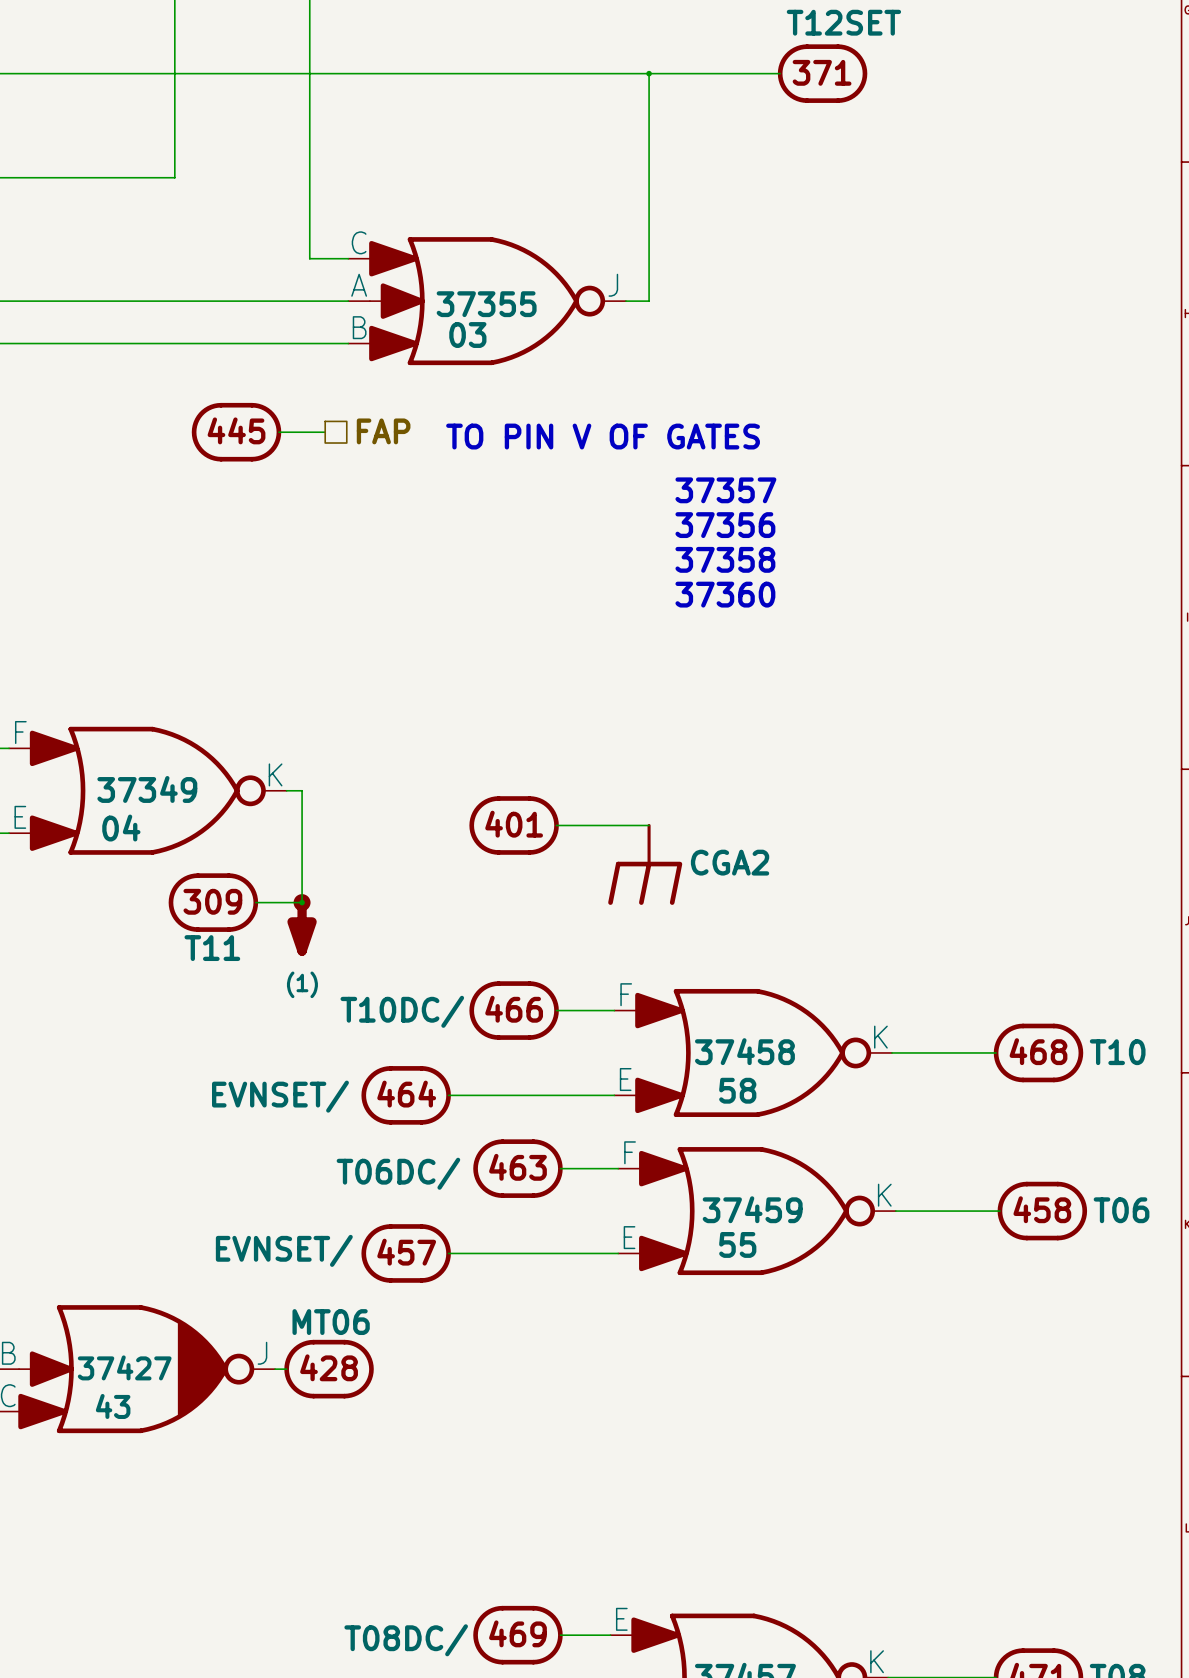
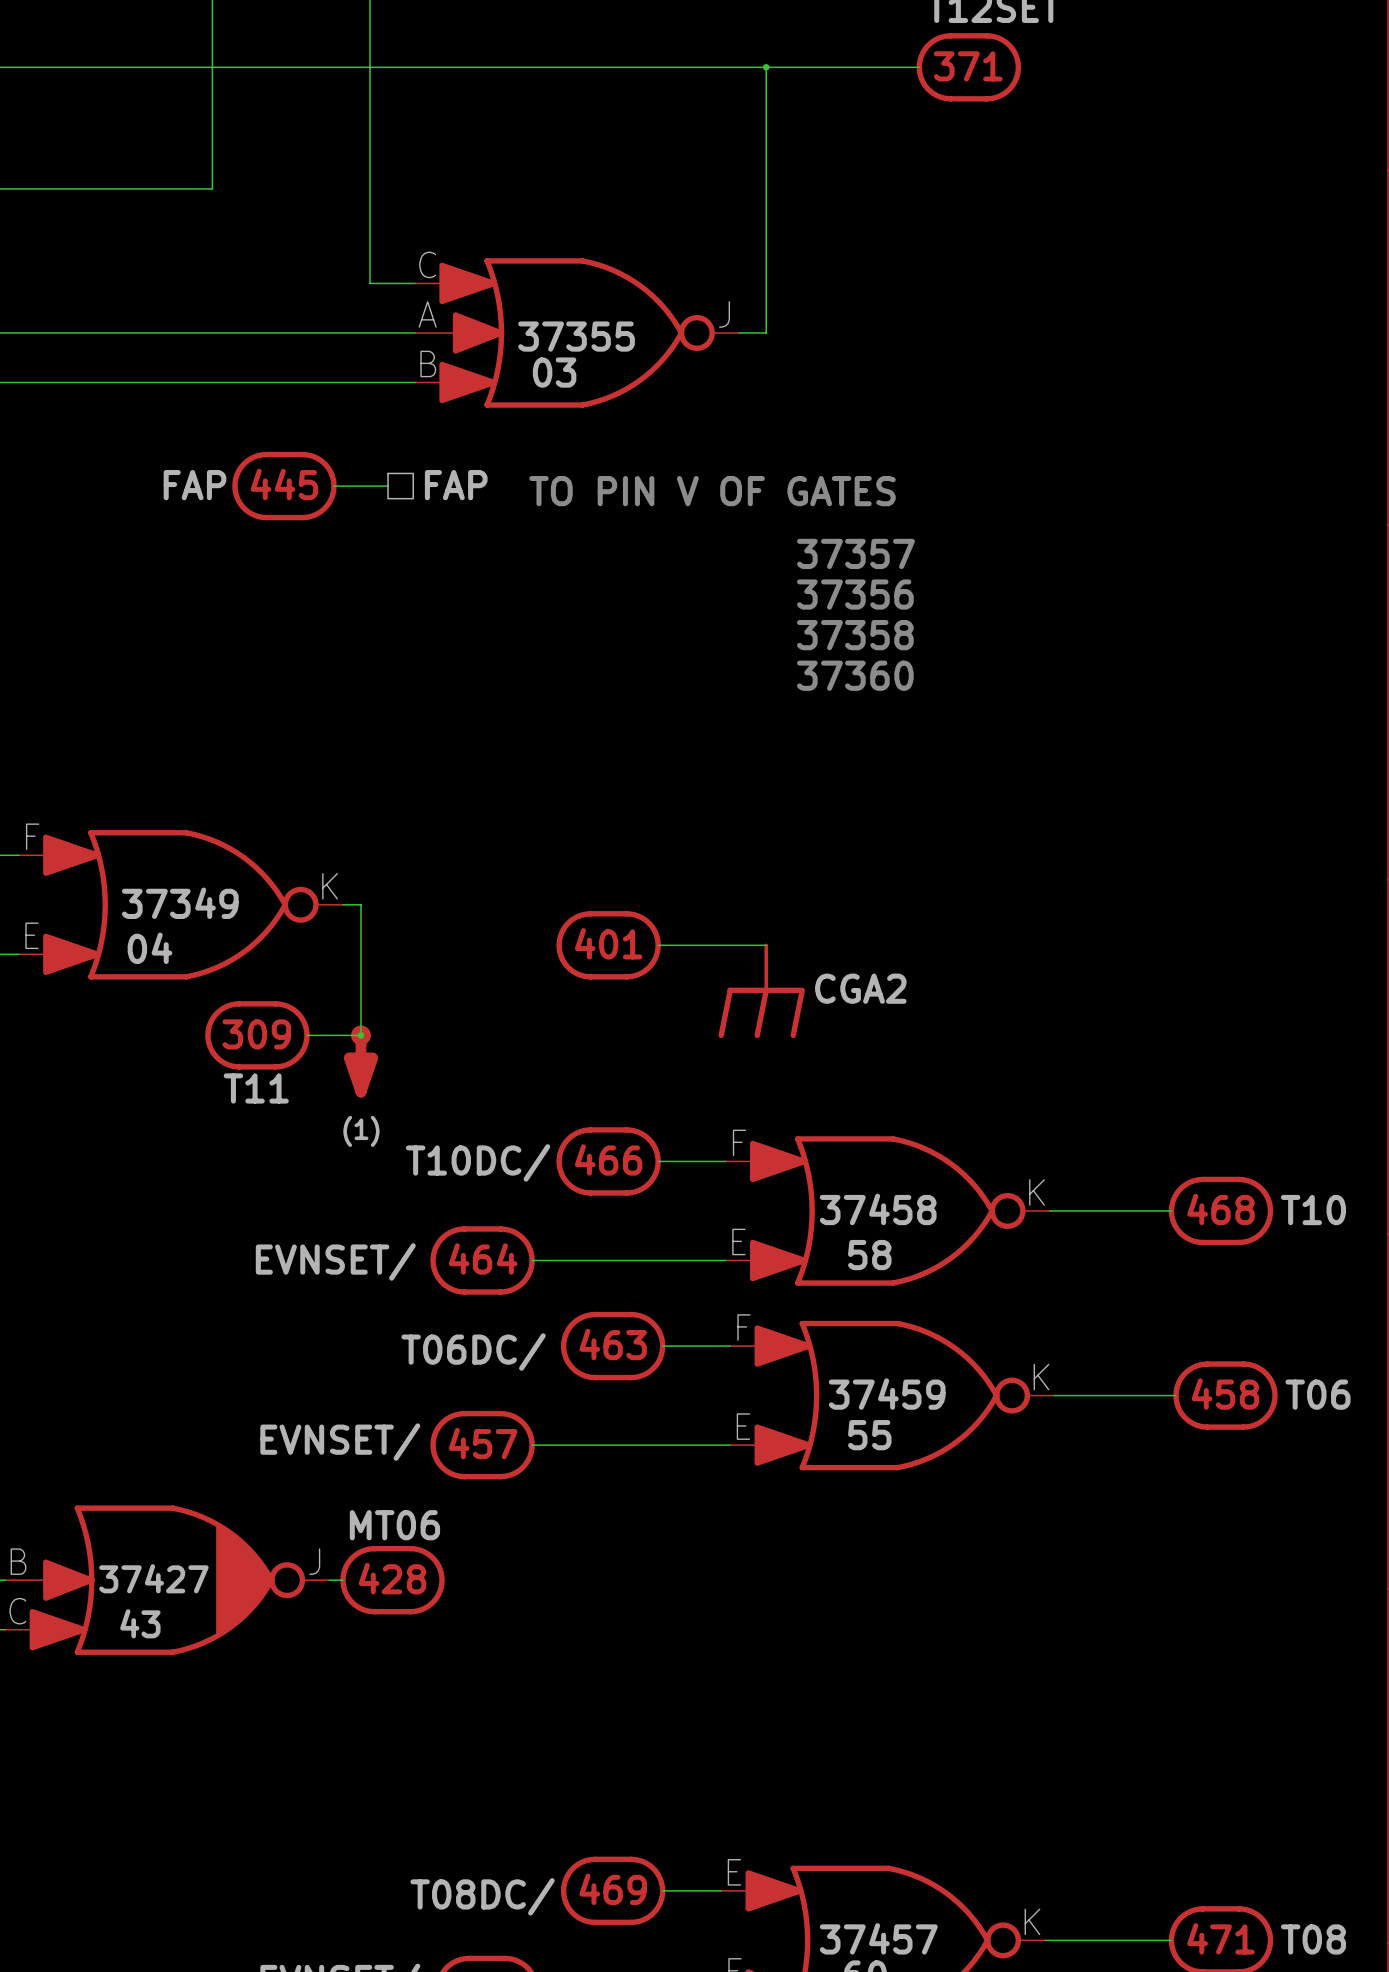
part text: none -> FAP (195, 485)

